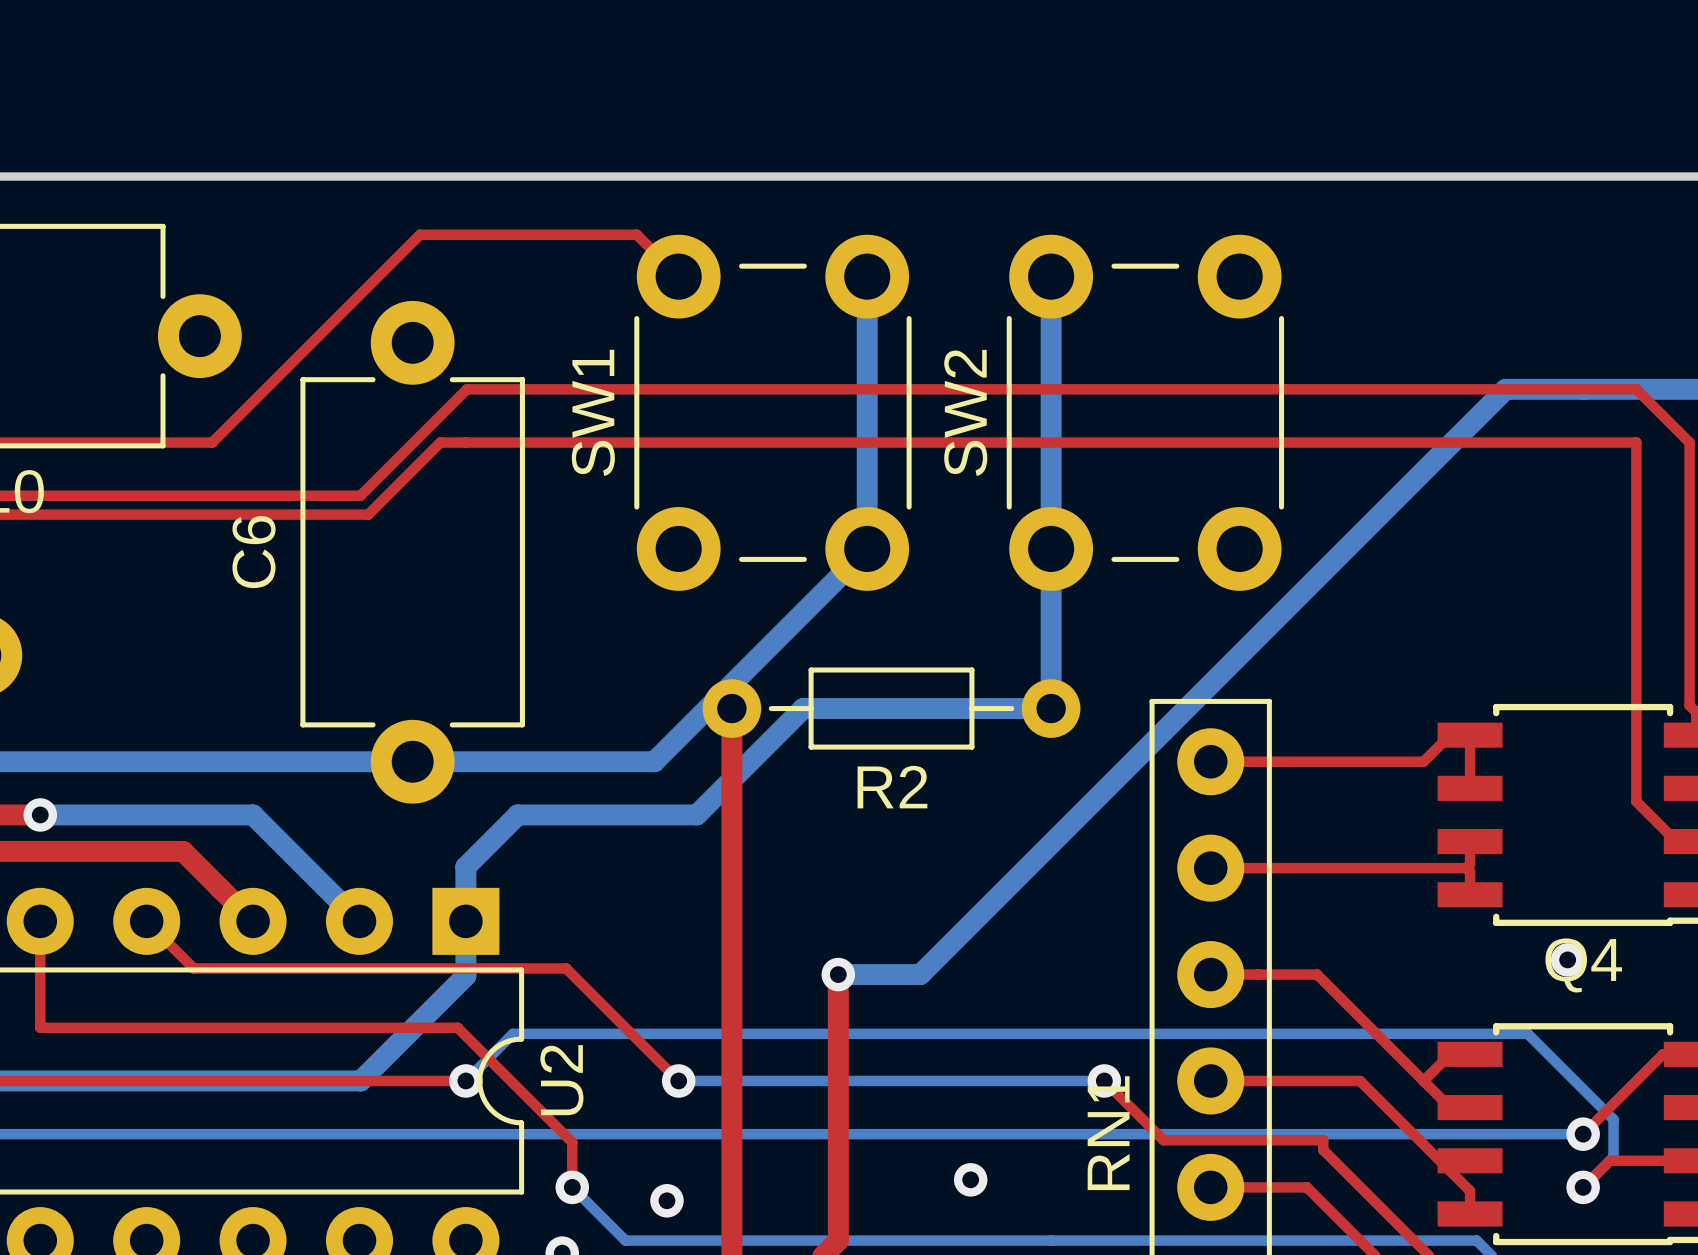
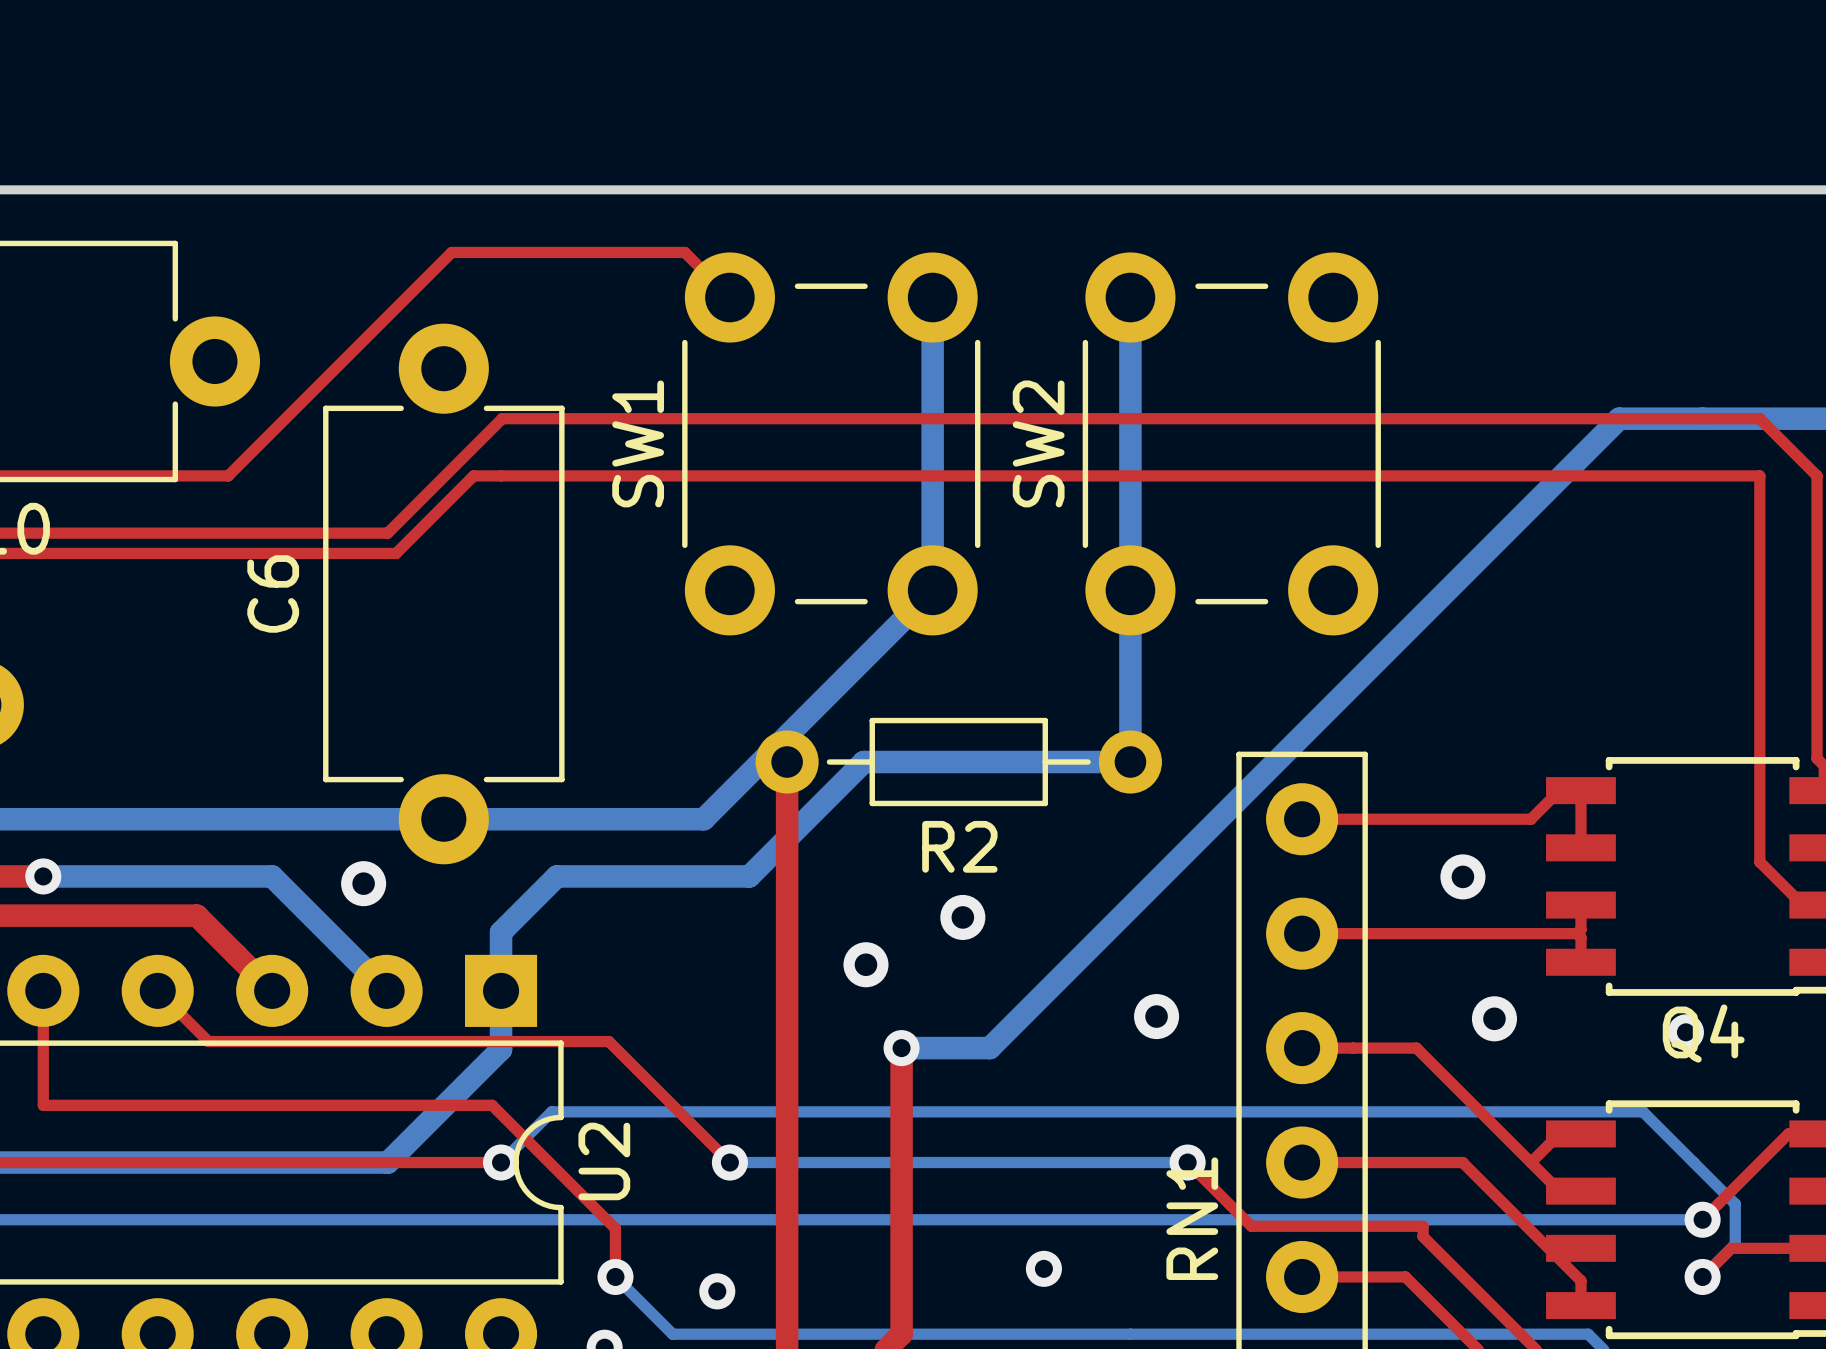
via: none -> (1462, 876)
via: none -> (363, 883)
via: none -> (962, 917)
via: none -> (865, 964)
via: none -> (1156, 1016)
via: none -> (1494, 1018)

